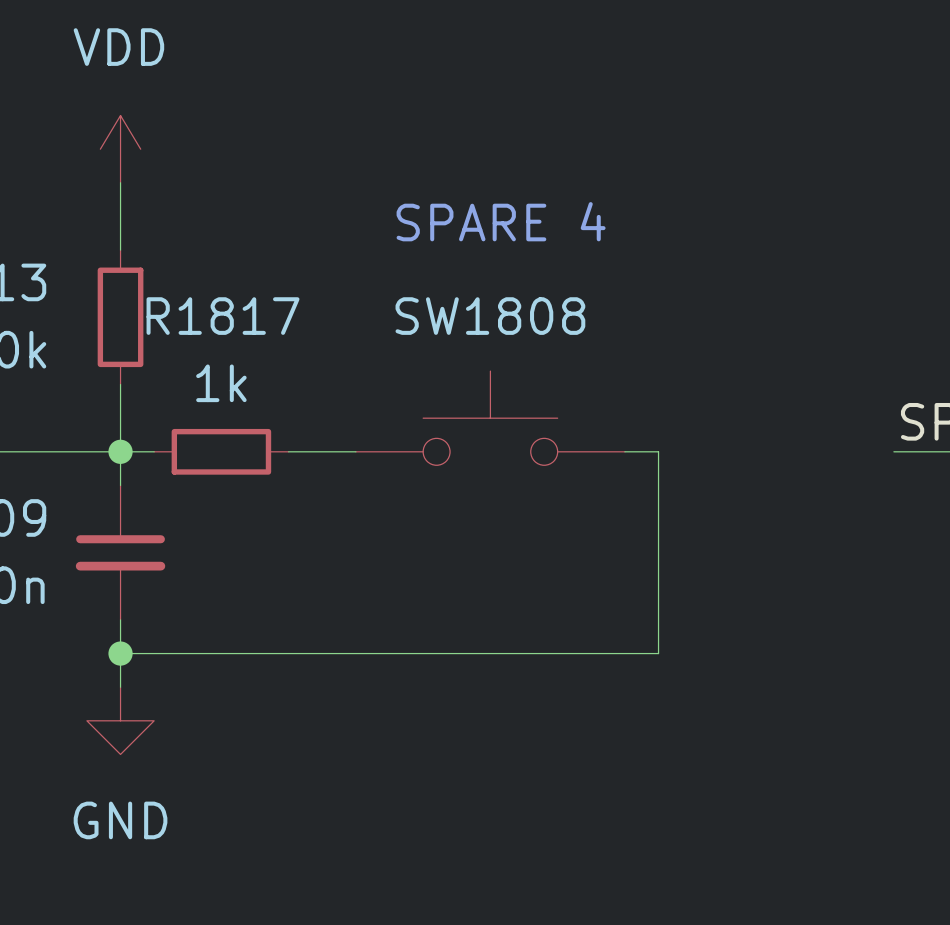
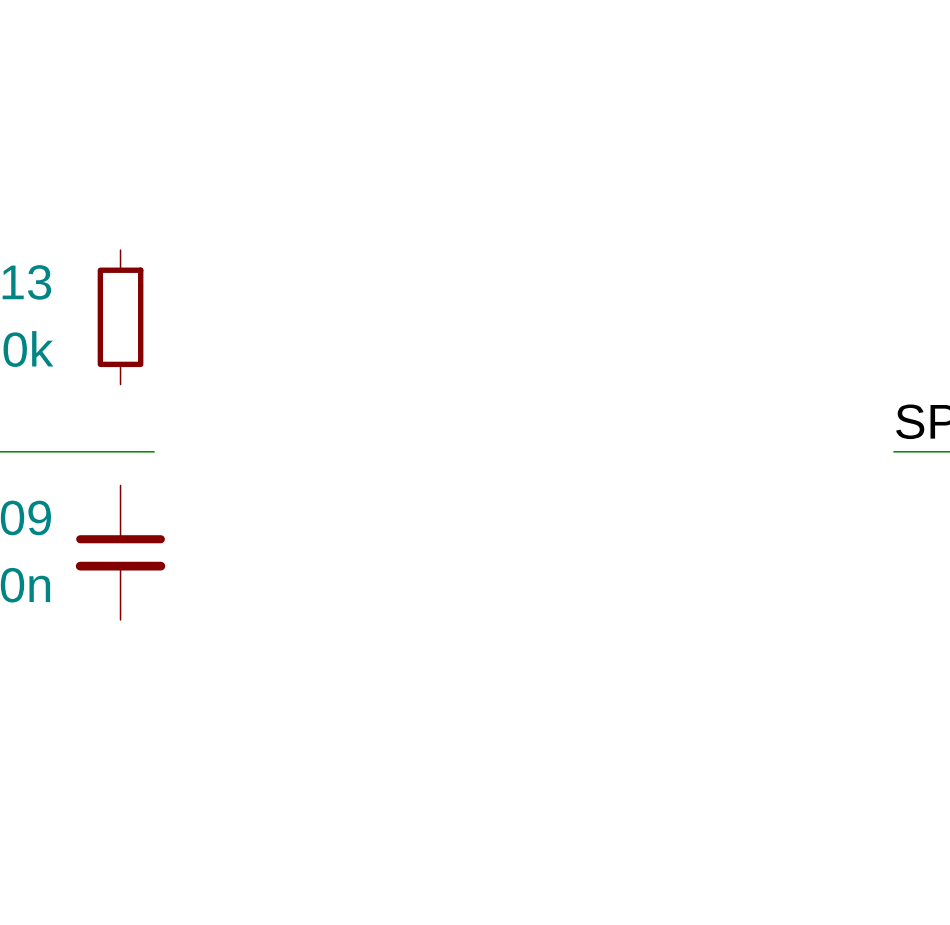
power symbol: VDD (120, 149) -> none
wire: (120, 182) (120, 250) -> none
text: SPARE 4 (501, 221) -> none
wire: (120, 384) (120, 485) -> none
SW1808: (490, 418) -> none
junction: (120, 451) -> none
R1817: 1k (221, 451) -> none
wire: (288, 451) (355, 451) -> none
wire: (624, 451) (658, 451) (658, 653) (120, 653) -> none
wire: (120, 619) (120, 687) -> none
junction: (120, 653) -> none
power symbol: GND (120, 720) -> none

